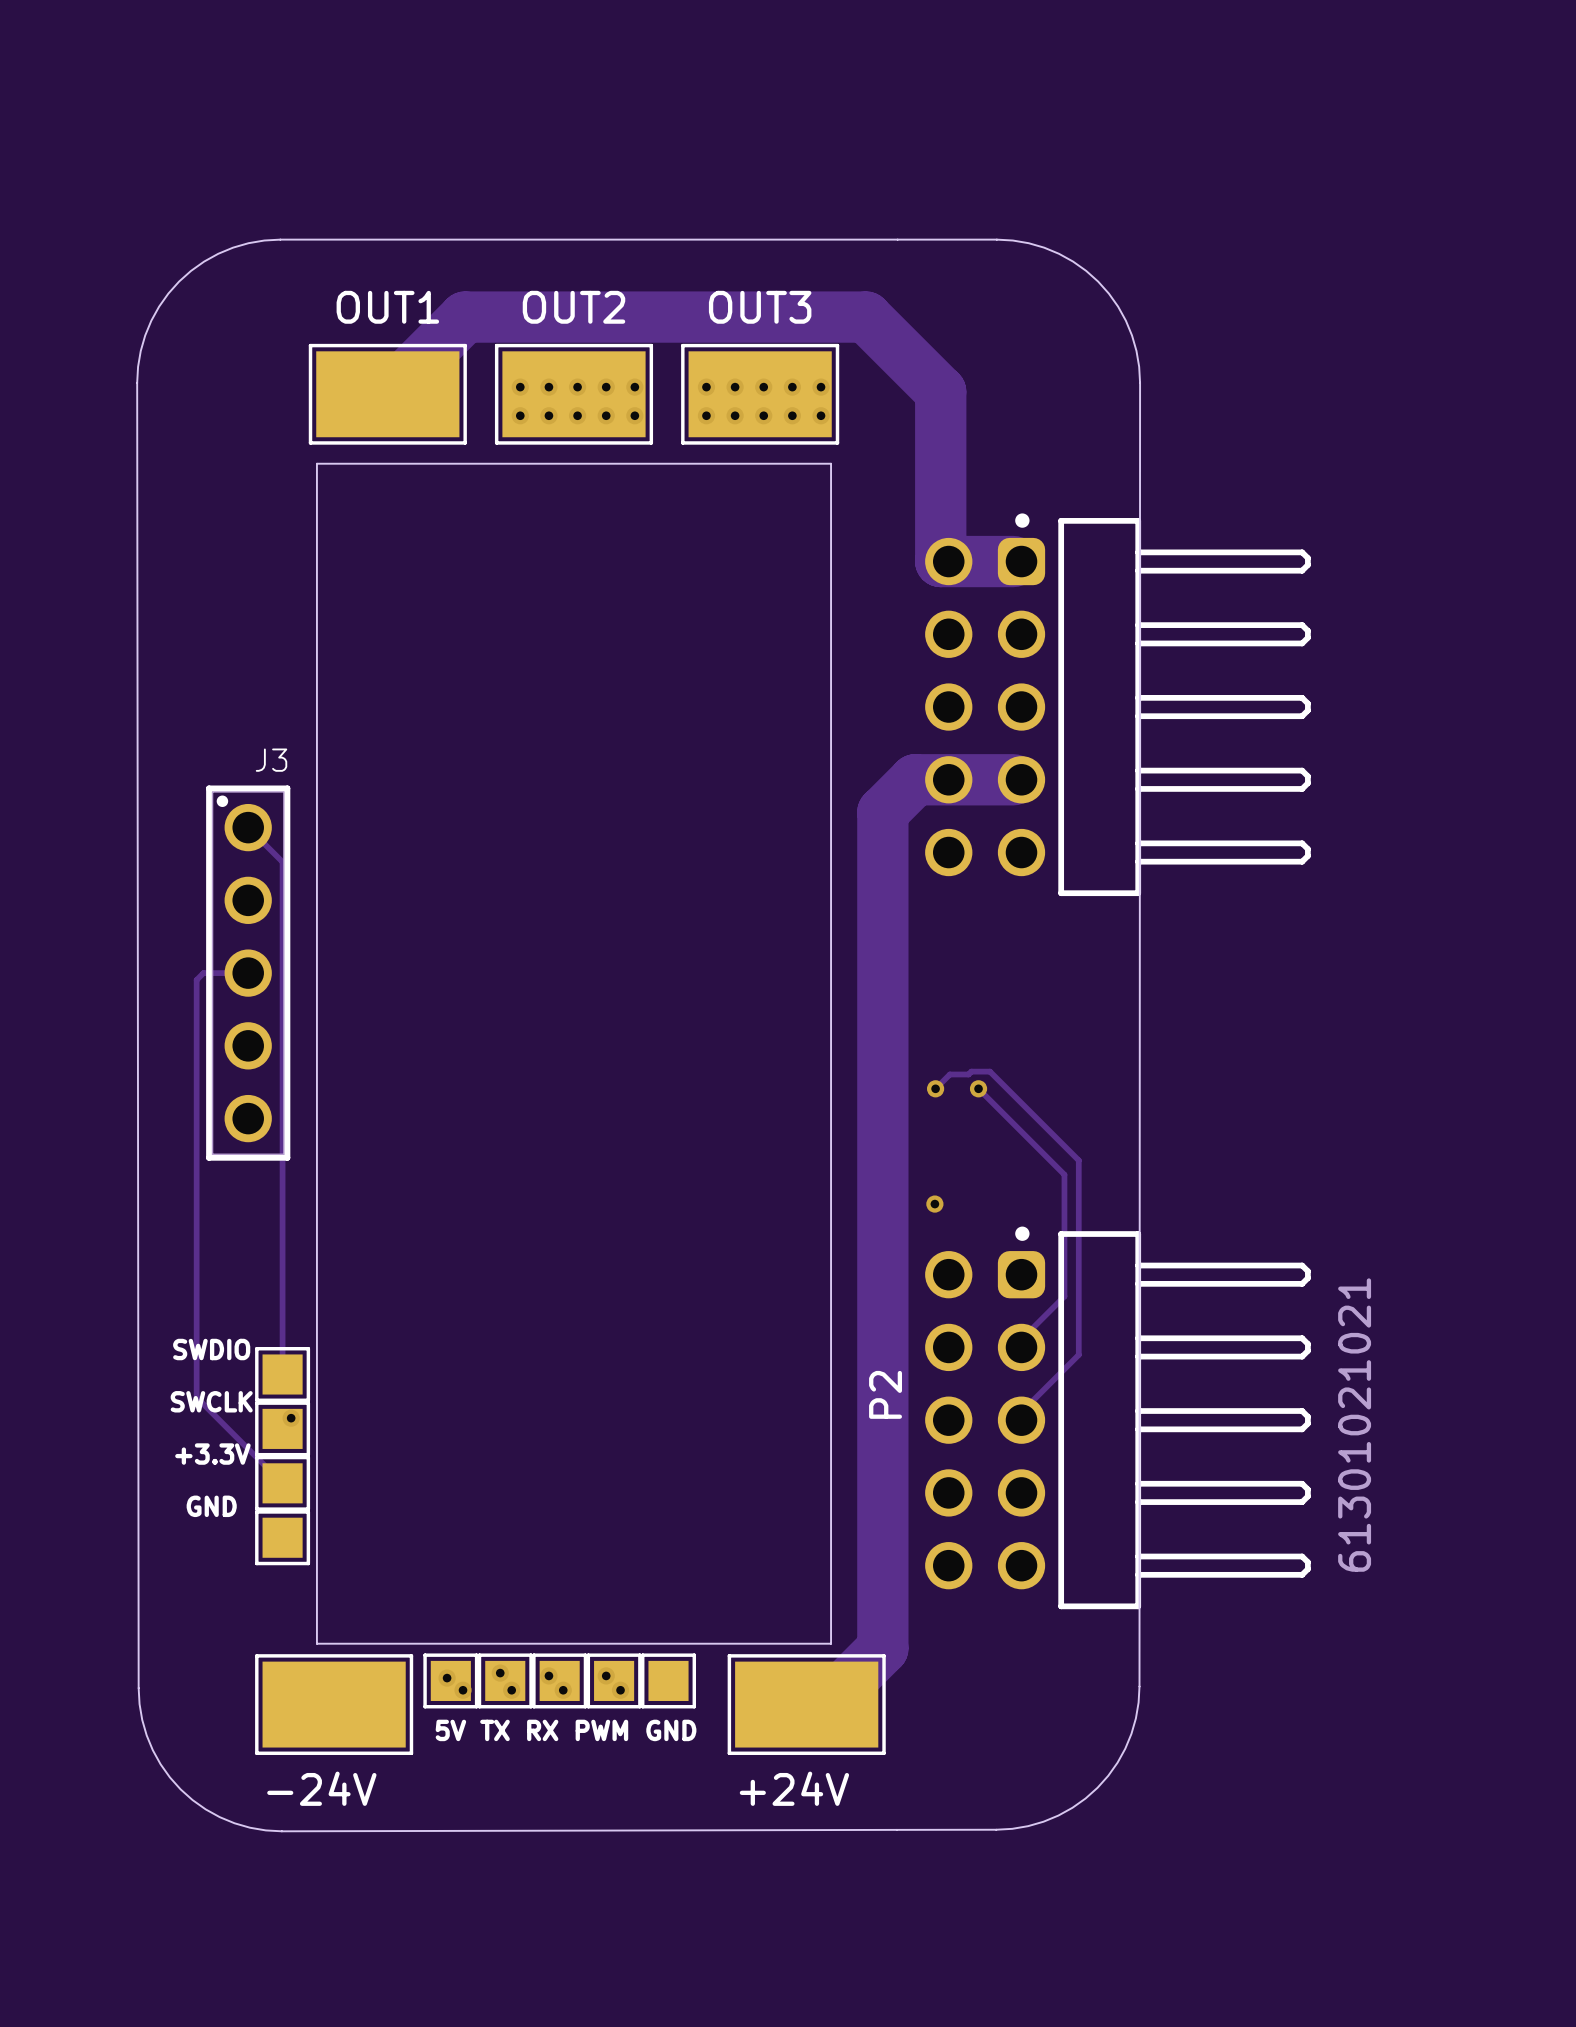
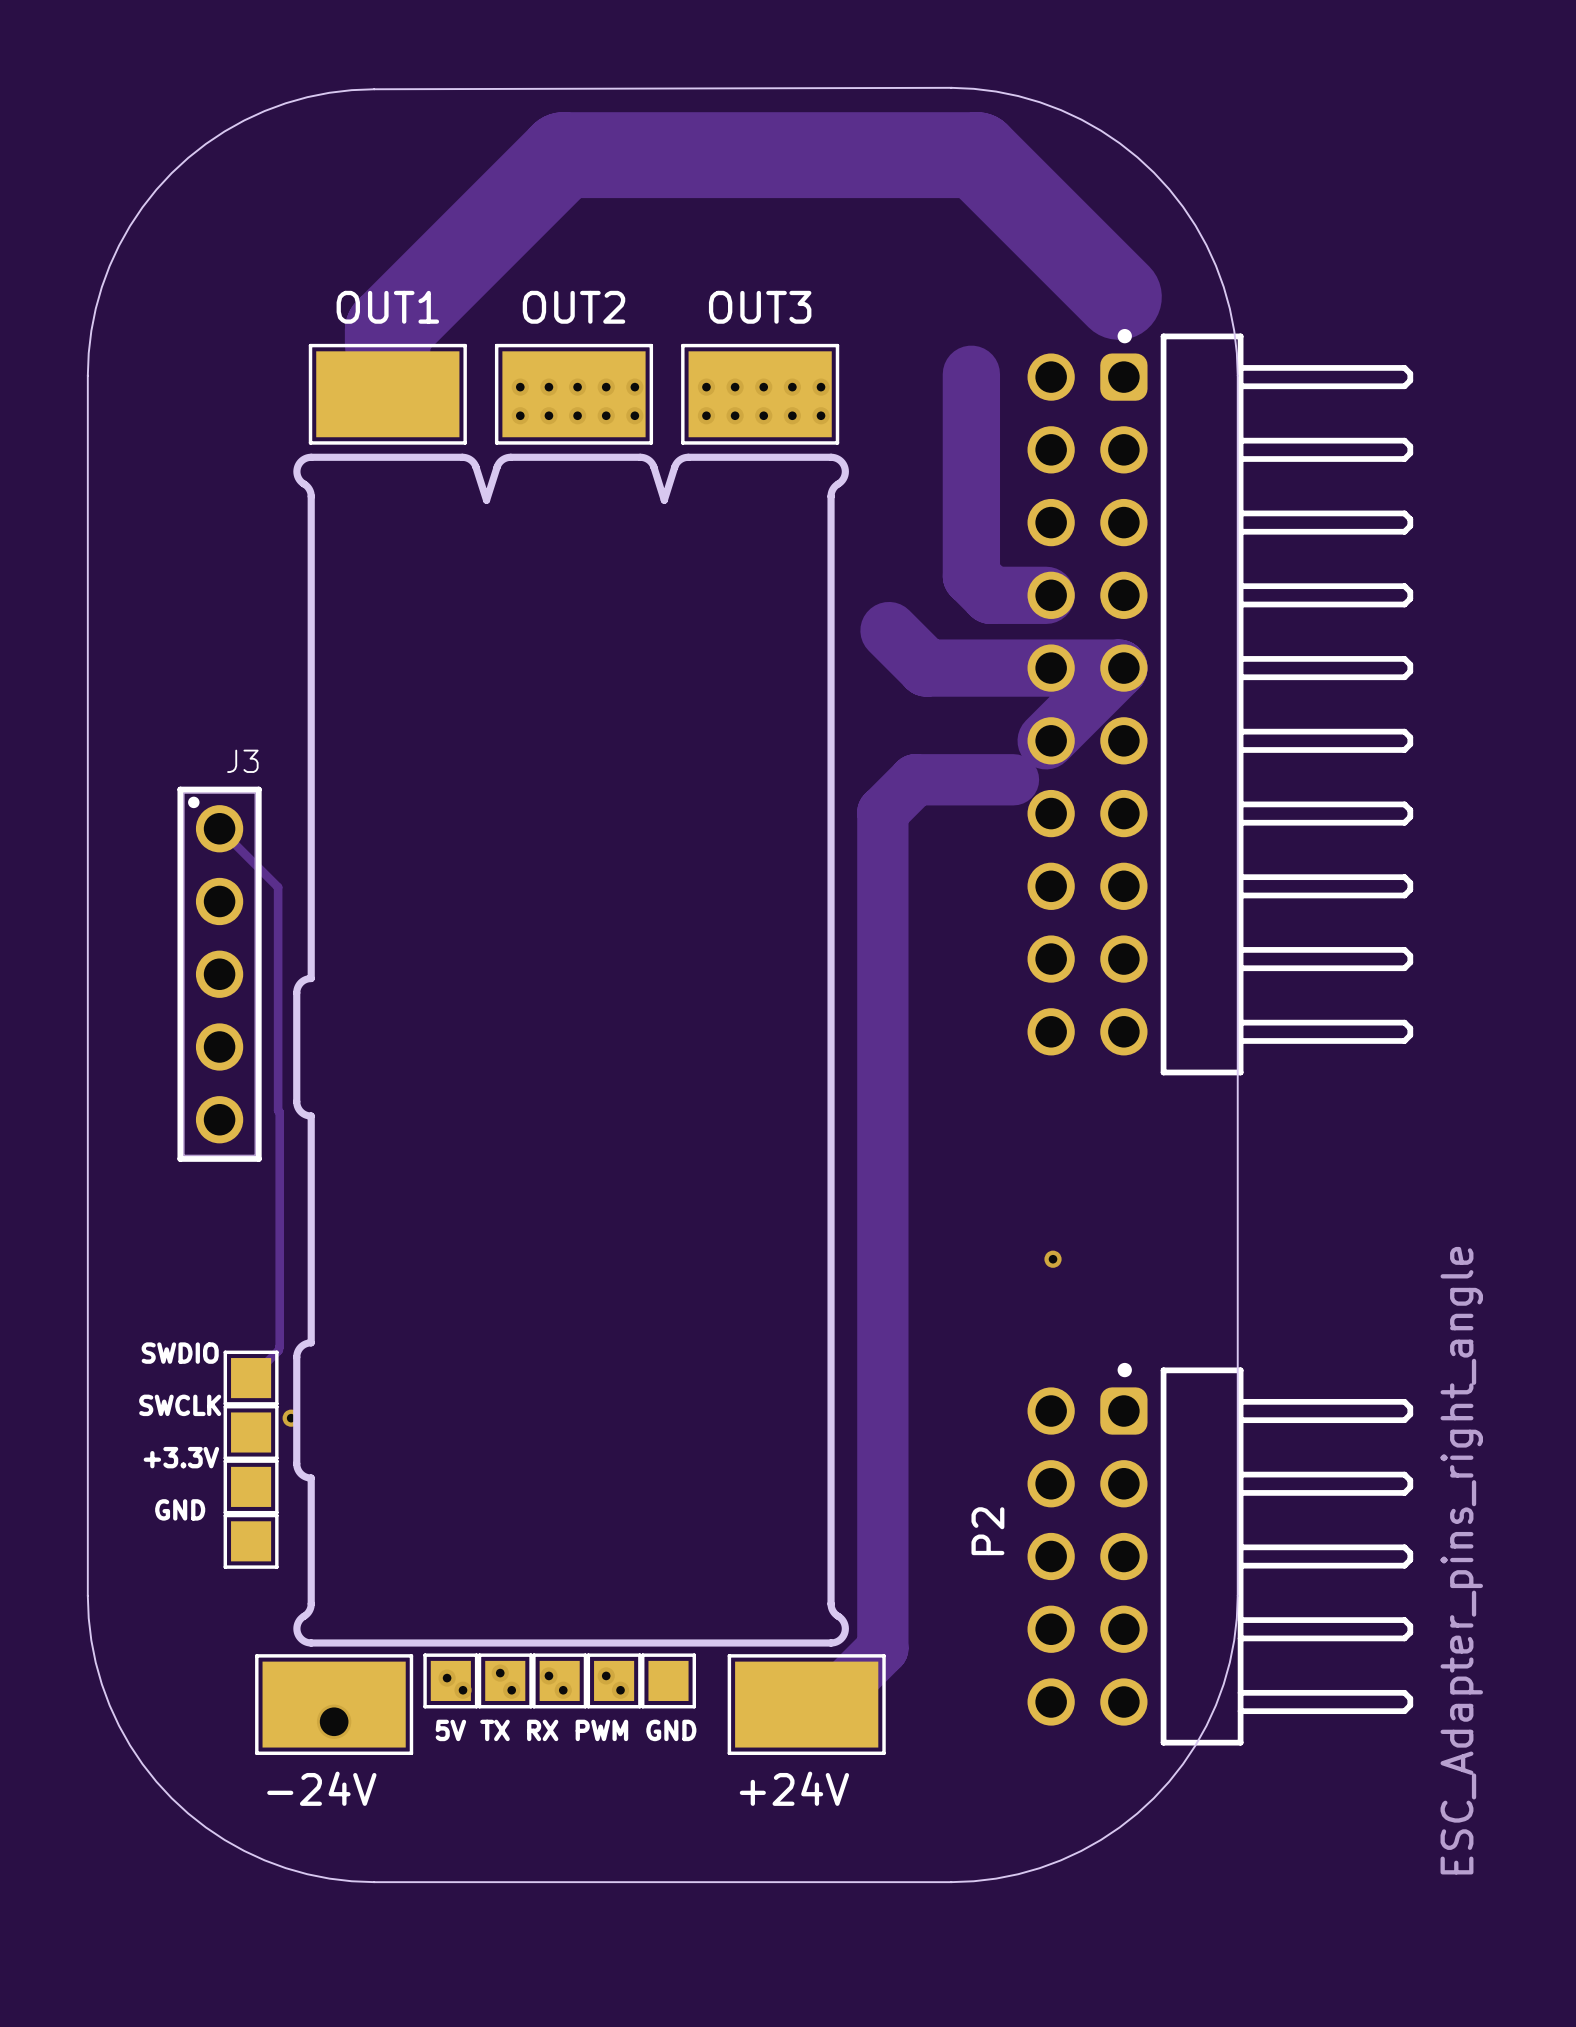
board edge: (280, 239) (1012, 240) (1044, 247) (1073, 261) (1086, 270) (1108, 293) (1125, 320) (1136, 350) (1140, 382) (1139, 1686) (1135, 1718) (1131, 1733) (1117, 1762) (1097, 1787) (1085, 1798) (1058, 1815) (1028, 1826) (996, 1829) (265, 1830) (234, 1823) (219, 1817) (192, 1800) (169, 1777) (152, 1750) (142, 1719) (138, 1688) (138, 366) (140, 350) (151, 320) (159, 306) (179, 281) (204, 261) (218, 253) (248, 243) (280, 239) -> (951, 87) (374, 89) (329, 92) (307, 97) (285, 103) (244, 120) (205, 143) (188, 157) (171, 173) (142, 207) (119, 245) (109, 266) (95, 308) (91, 330) (87, 375) (88, 1618) (95, 1662) (109, 1705) (130, 1745) (142, 1764) (171, 1798) (188, 1813) (224, 1839) (264, 1860) (307, 1874) (351, 1881) (374, 1882) (951, 1882) (996, 1878) (1018, 1874) (1060, 1860) (1081, 1850) (1119, 1827) (1153, 1798) (1183, 1764) (1206, 1725) (1215, 1705) (1229, 1662) (1234, 1640) (1237, 1595) (1237, 375) (1234, 330) (1223, 286) (1206, 245) (1183, 206) (1153, 172) (1137, 157) (1101, 130) (1061, 110) (1018, 96) (996, 91) (951, 87)
track: none -> (971, 374) (971, 576) (990, 595) (1046, 595)
track: (387, 394) (465, 317) (866, 317) (940, 391) (940, 561) (1013, 561) -> (387, 394) (387, 330) (563, 155) (977, 155) (1118, 296)
board edge: (831, 496) (831, 463) (316, 463) (316, 1643) (831, 1643) (831, 1603) -> (831, 496) (832, 489) (842, 480) (845, 471) (841, 461) (832, 457) (684, 457) (675, 465) (664, 500) (653, 465) (648, 460) (642, 457) (507, 457) (497, 465) (486, 500) (475, 465) (465, 457) (311, 457) (301, 460) (297, 466) (297, 474) (300, 480) (309, 489) (311, 496) (311, 978)
board edge width: thin (831, 496) (831, 1603) -> thick (831, 496) (831, 1603)
P2 footprint: [925, 513, 1311, 1610] -> [1027, 328, 1414, 1746]
track: none -> (888, 630) (926, 668) (1118, 668) (1046, 740)
track: (248, 827) (282, 861) (282, 1374) -> none
track: none -> (219, 828) (278, 887) (279, 1346) (278, 1350) (251, 1378)
track: (248, 973) (203, 973) (196, 979) (196, 1397) (282, 1483) -> none
J3 position: (248, 973) -> (219, 974)
board edge: none -> (311, 978) (300, 982) (296, 992) (296, 1103) (302, 1112) (311, 1116)
track: (935, 1088) (949, 1074) (990, 1071) (1078, 1160) (1078, 1354) (1013, 1420) -> none
via: (935, 1088) -> none
track: (978, 1088) (1064, 1174) (1064, 1296) (1013, 1347) -> none
via: (978, 1088) -> none
board edge: none -> (311, 1116) (311, 1342)
via: (934, 1204) -> none
via: none -> (1053, 1259)
board edge: none -> (311, 1342) (300, 1347) (296, 1357) (296, 1465) (302, 1474) (311, 1478)
SWDIO position: (282, 1374) -> (251, 1378)
P2 name position: P2 (885, 1394) -> P2 (987, 1531)
P2 value: 61301021021 (1354, 1425) -> ESC_Adapter_pins_right_angle (1461, 1560)
SWCLK position: (282, 1428) -> (251, 1432)
board edge: none -> (311, 1478) (311, 1605) (308, 1612) (299, 1620) (296, 1629) (299, 1636) (307, 1642) (832, 1642) (842, 1637) (845, 1628) (843, 1621) (834, 1612) (831, 1603)
+3.3V position: (282, 1483) -> (251, 1486)
GND position: (282, 1537) -> (251, 1541)
via: none -> (334, 1721)

